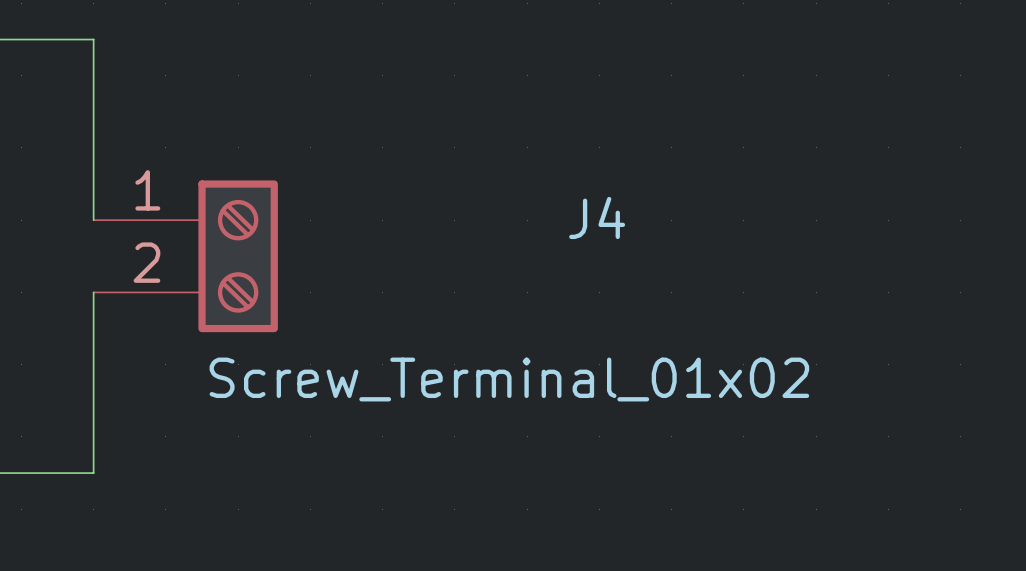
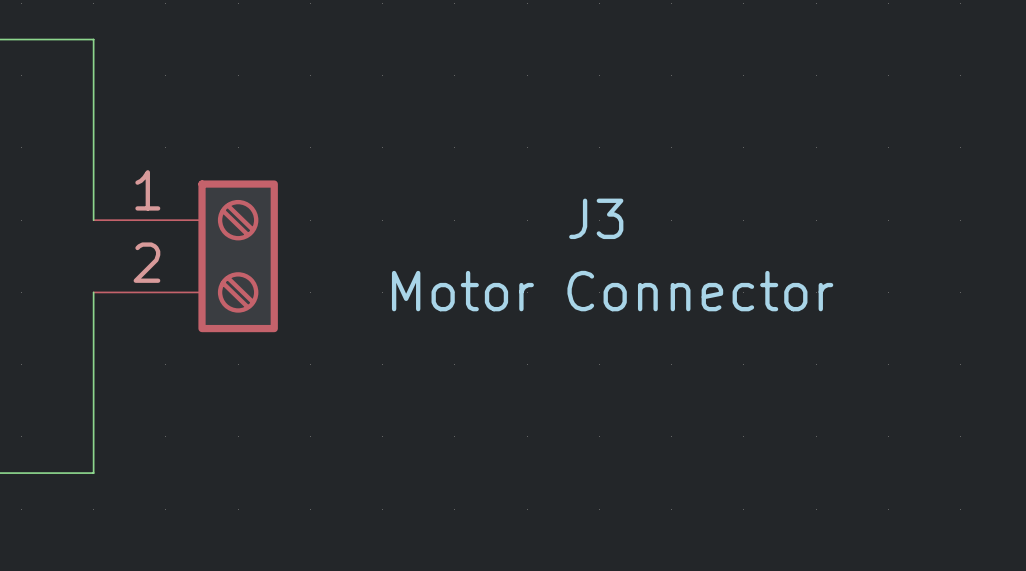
J4 name: J4 (597, 217) -> J3 (596, 218)
J4 value: Screw_Terminal_01x02 (509, 379) -> Motor Connector (612, 291)

